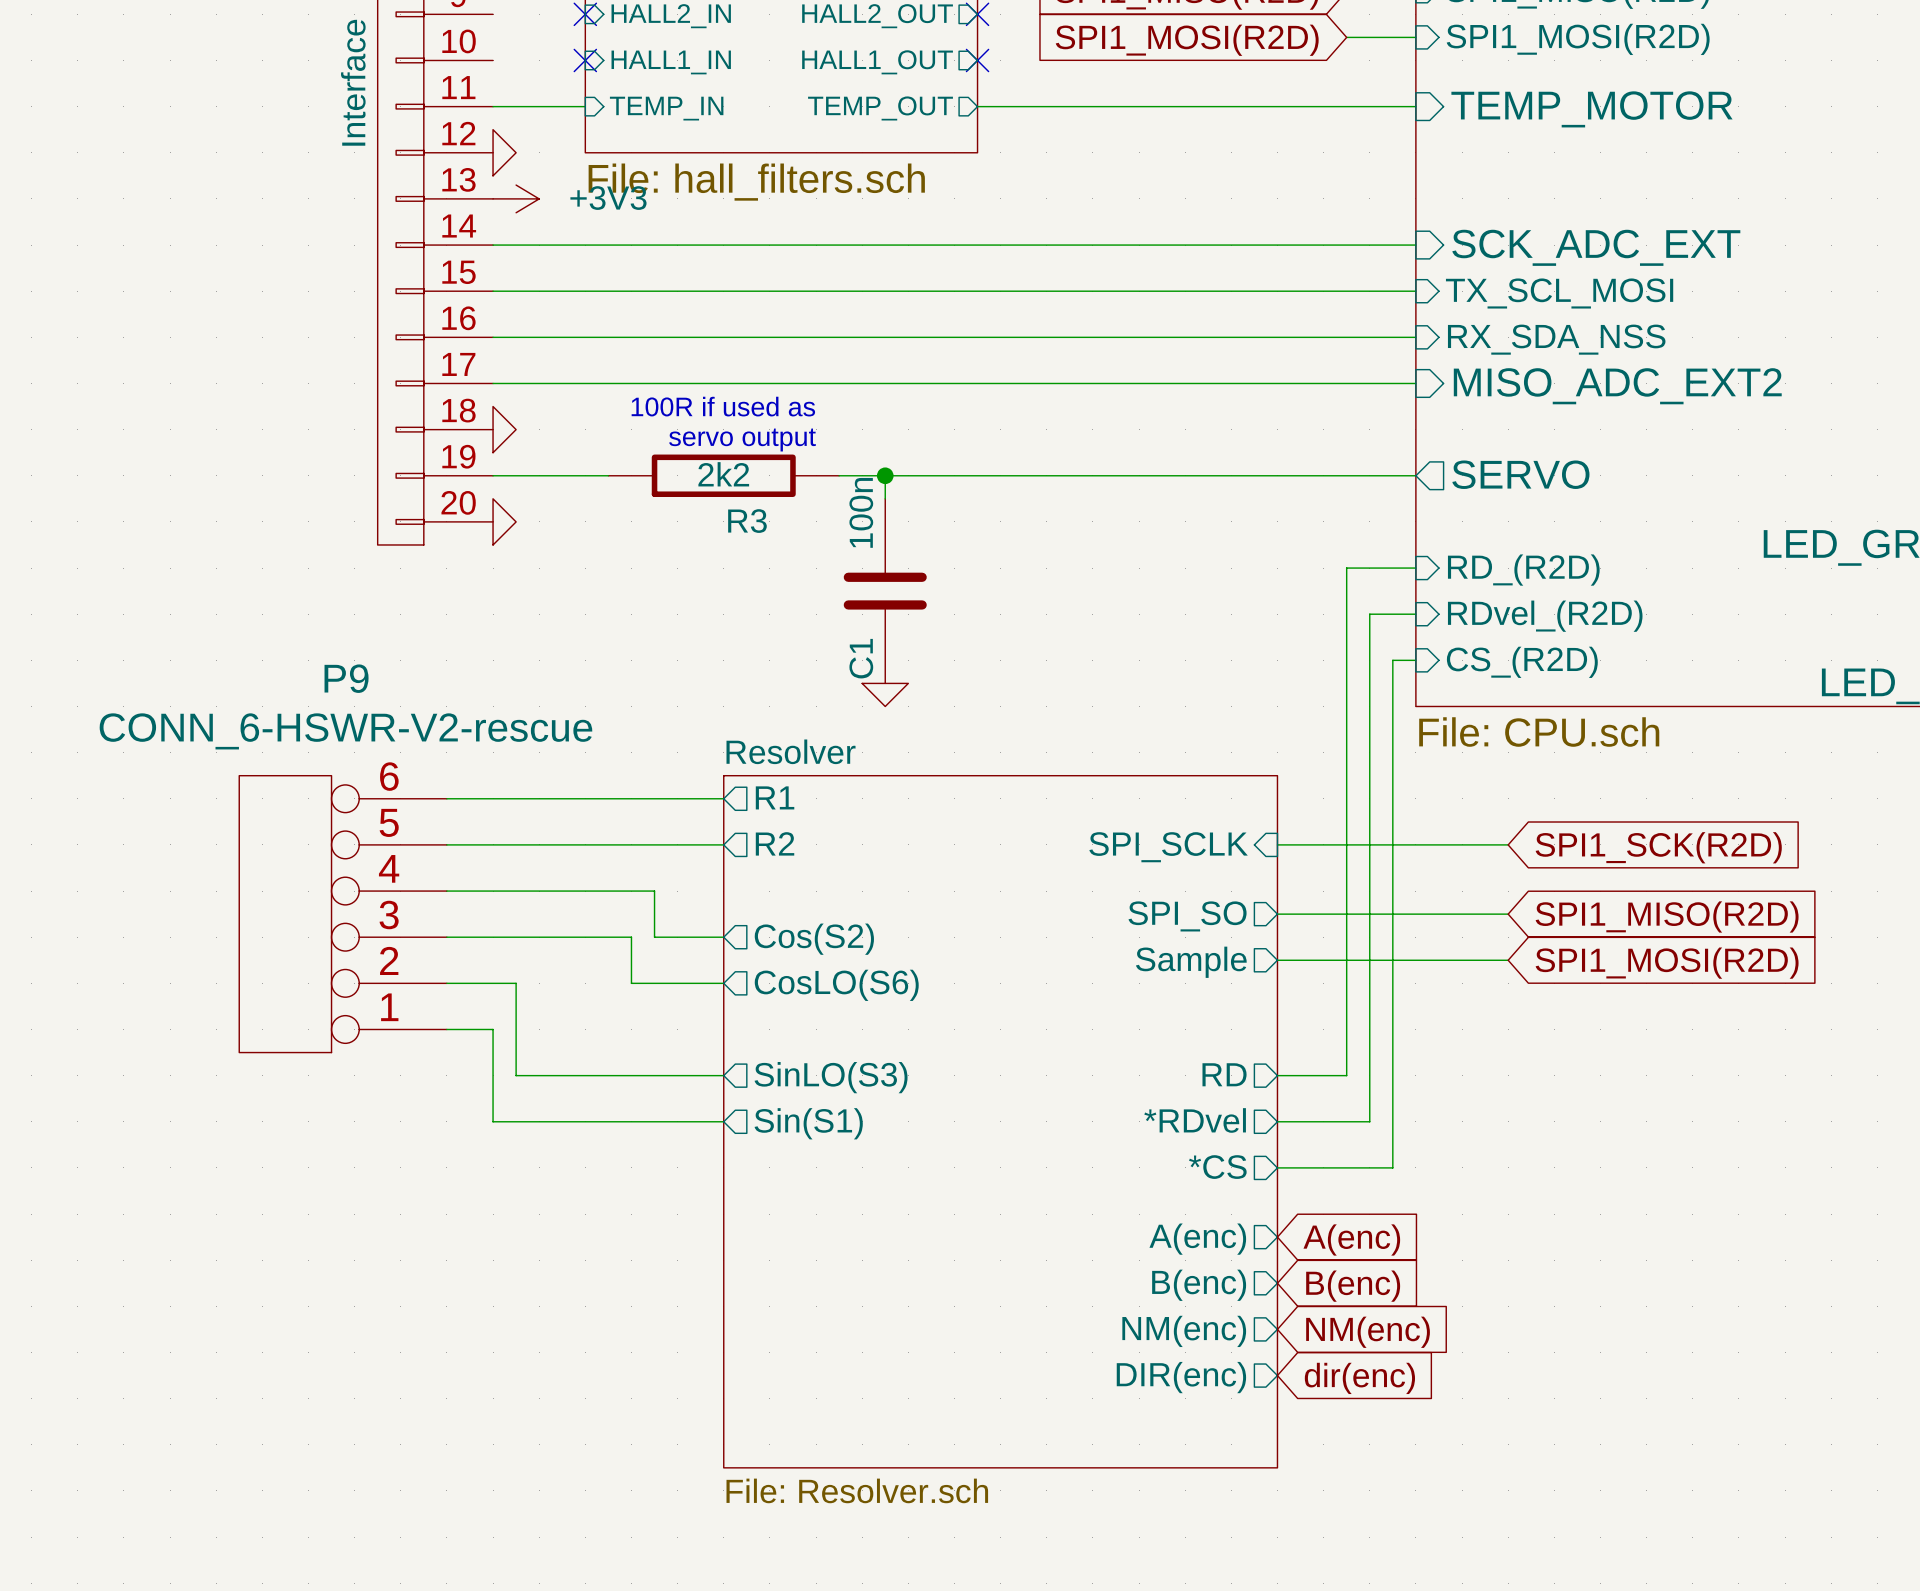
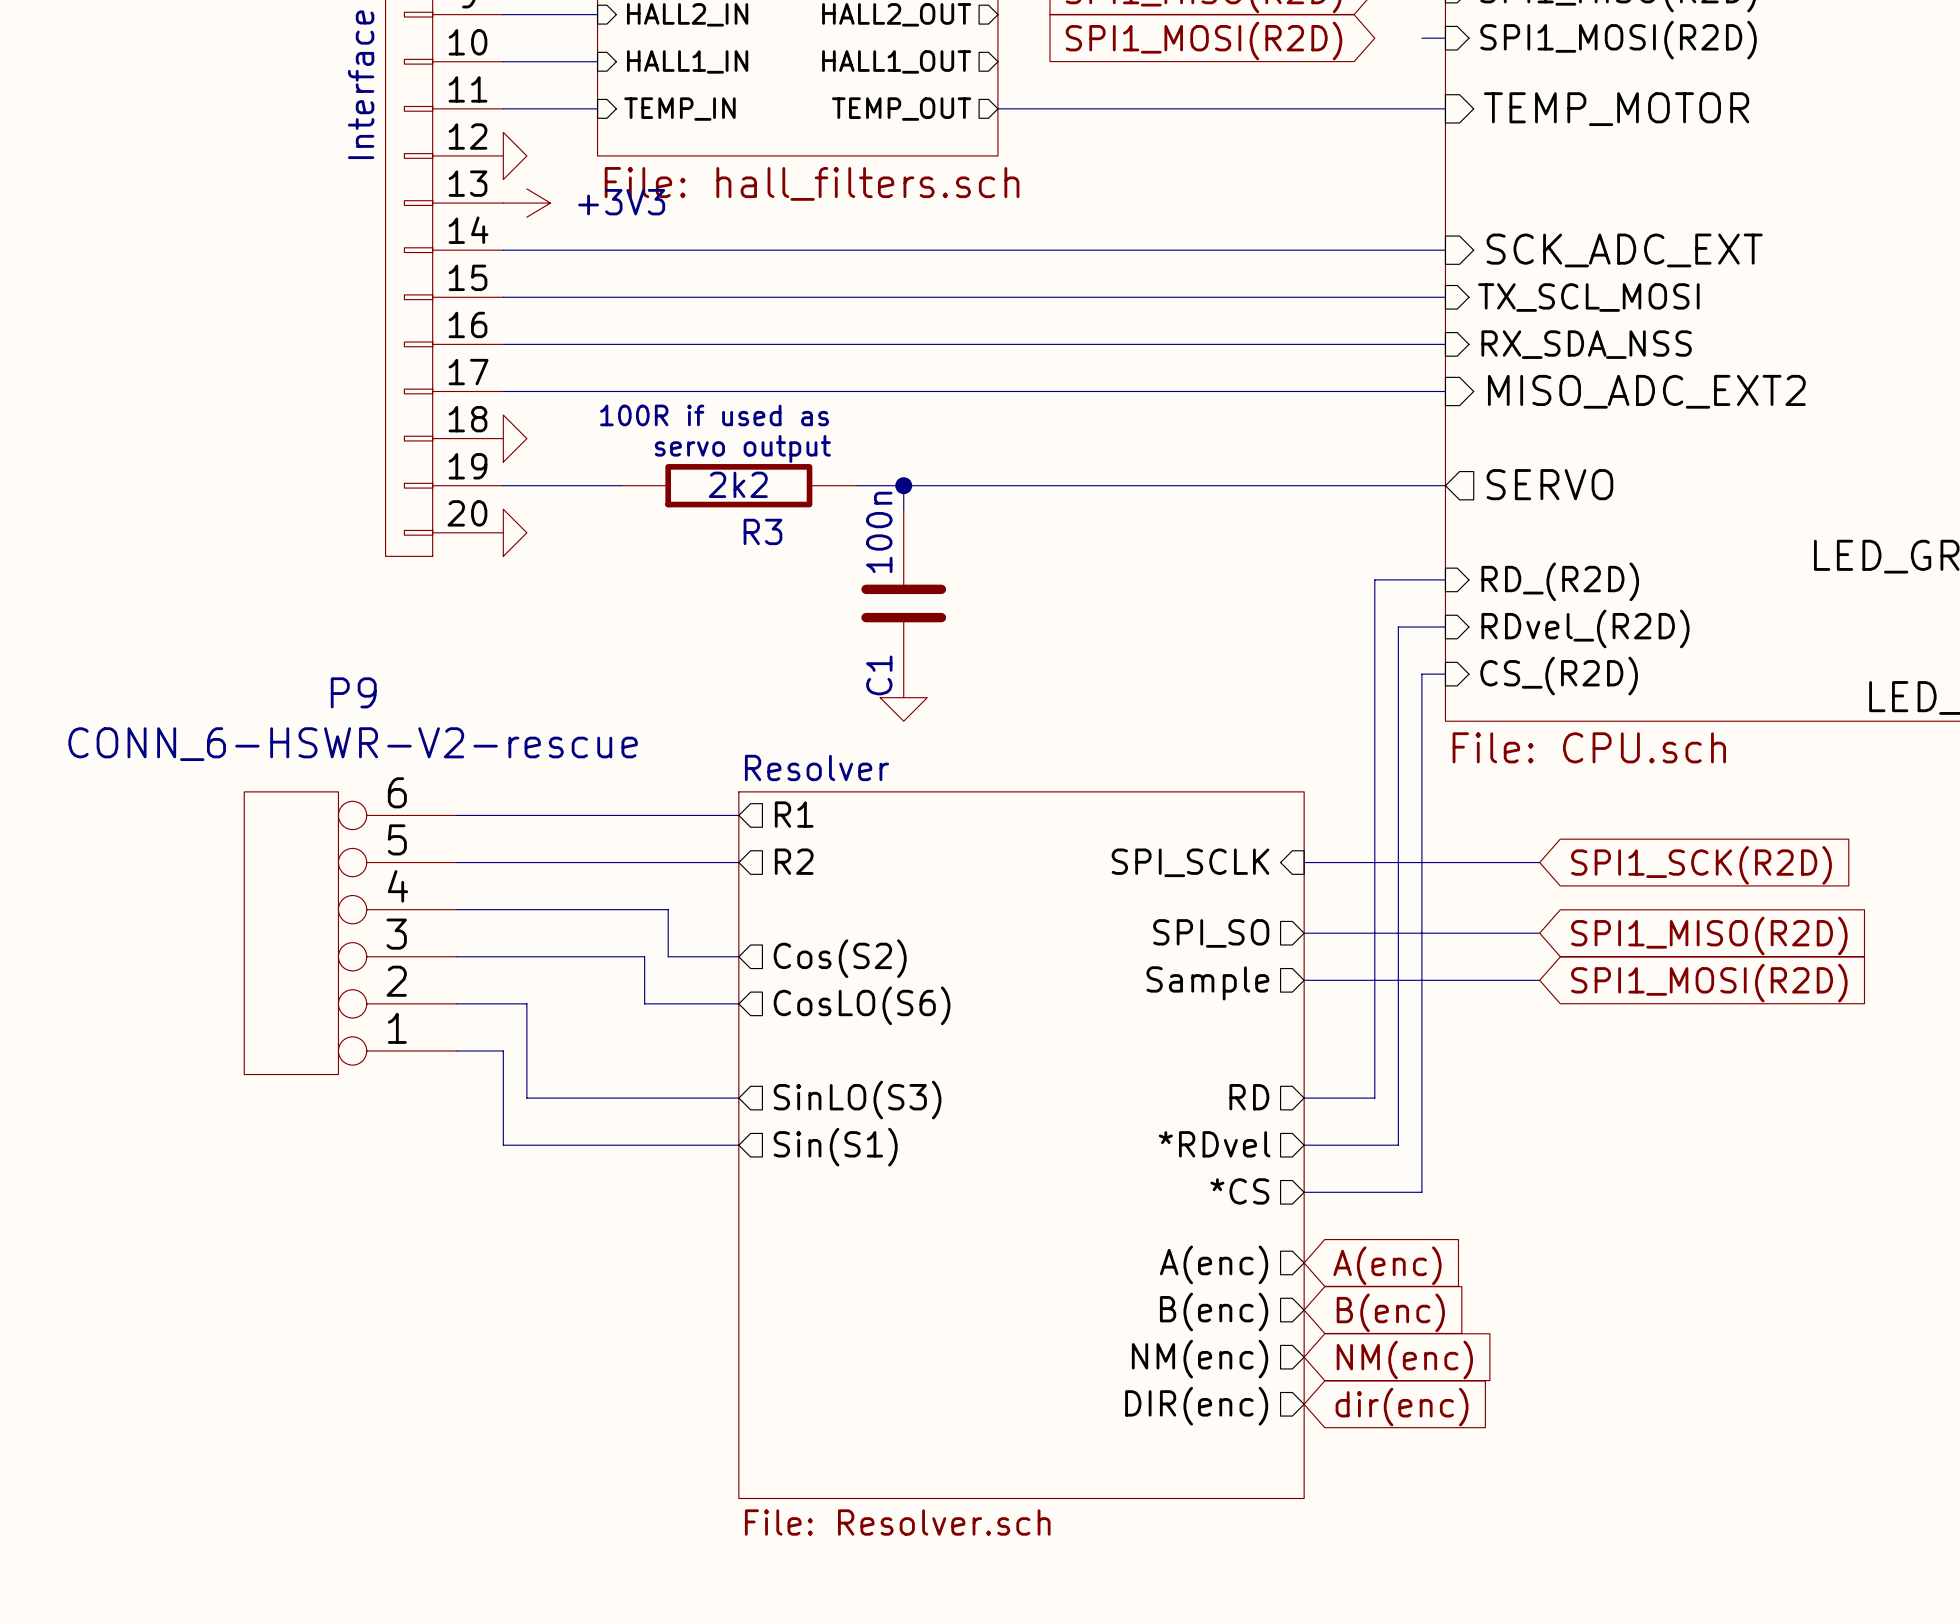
wire: none -> (503, 14) (597, 14)
no-connect mark: (585, 14) -> none
no-connect mark: (977, 14) -> none
wire: (1346, 37) (1392, 37) -> none
wire: none -> (503, 61) (597, 61)
no-connect mark: (585, 60) -> none
no-connect mark: (977, 60) -> none

